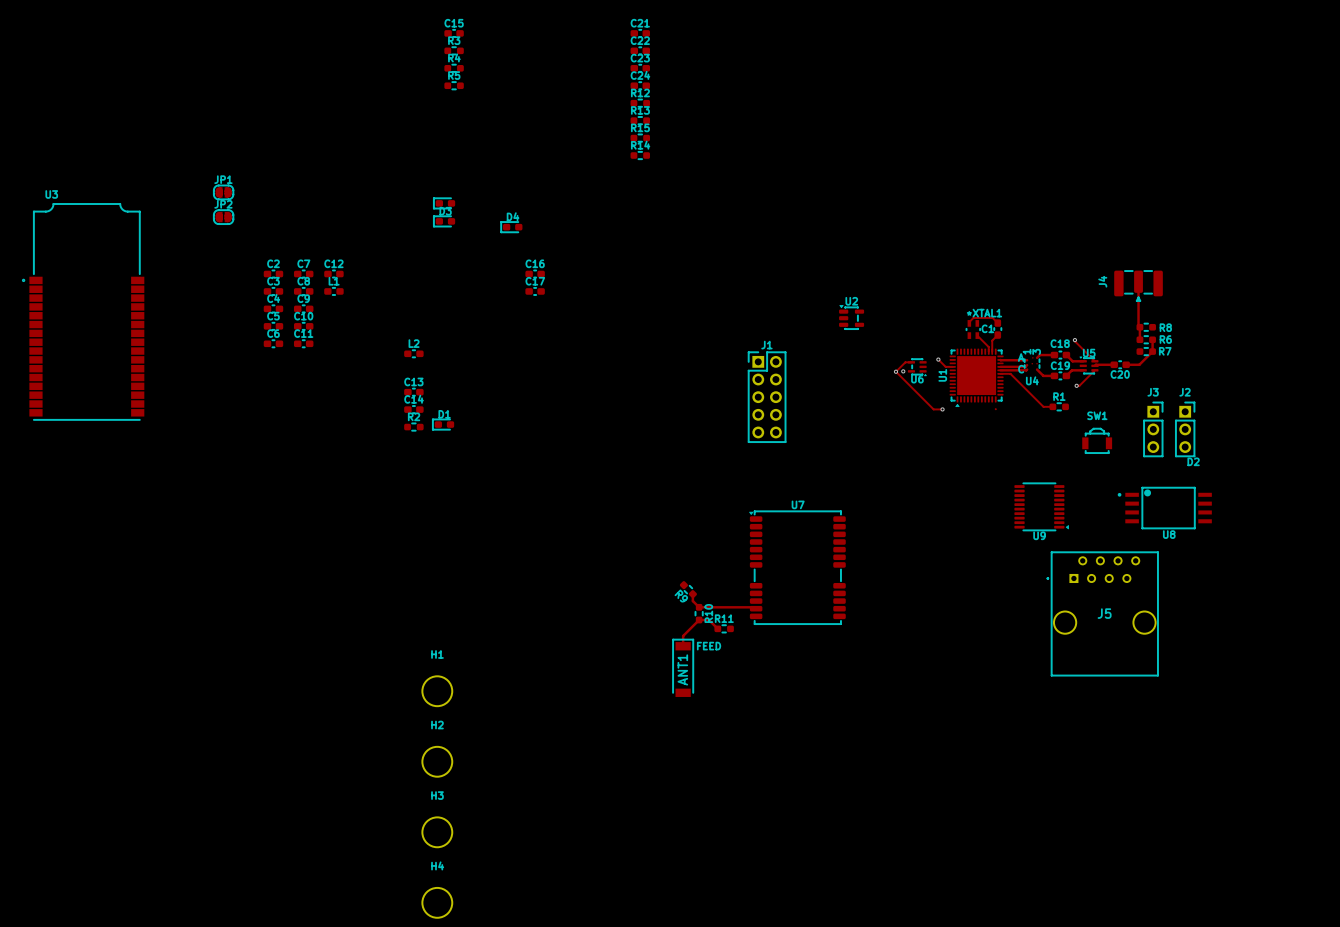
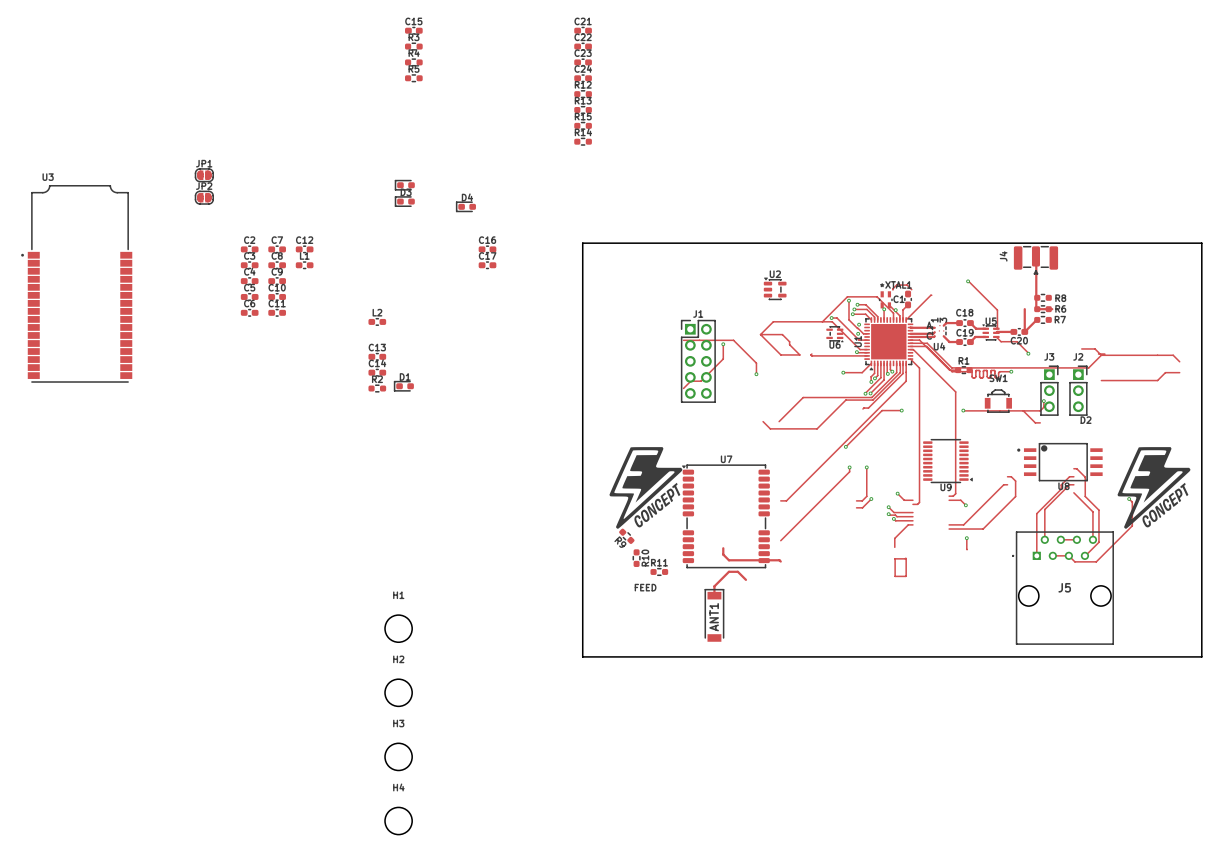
board edge: none -> (582, 243) (1201, 243) (1201, 656) (582, 656) (582, 243)
track: (1138, 281) (1139, 339) -> (1035, 256) (1036, 309) (1052, 309)
track: none -> (911, 289) (907, 285) (896, 285) (892, 290)
track: (997, 323) (992, 317) (973, 317) (969, 323) -> none
track: none -> (931, 295) (906, 319)
via: none -> (848, 300)
track: none -> (857, 304) (865, 304) (877, 316) (877, 319)
via: none -> (857, 304)
track: none -> (884, 309) (884, 319)
via: none -> (884, 309)
track: none -> (1024, 309) (1024, 331) (1037, 319)
track: (1152, 339) (1152, 351) (1139, 364) (1126, 364) -> none
track: none -> (854, 309) (866, 309) (874, 317) (874, 319)
via: none -> (854, 309)
via: none -> (895, 310)
track: (1074, 340) (1094, 361) -> (968, 281) (997, 310) (996, 328)
via position: (1074, 340) -> (968, 281)
track: none -> (852, 314) (865, 314) (871, 319)
via: none -> (852, 314)
track: none -> (831, 318) (836, 318) (859, 340) (867, 340)
via: none -> (831, 318)
track: none -> (893, 319) (893, 313) (877, 296) (847, 296) (822, 321)
via: none -> (859, 324)
track: (938, 359) (945, 366) (948, 366) -> (848, 300) (848, 319) (863, 333)
via: (938, 359) -> none
track: (911, 362) (905, 362) (895, 371) (933, 409) (942, 409) -> none
via: none -> (858, 333)
track: none -> (760, 334) (773, 321) (832, 321) (860, 349) (867, 349)
track: none -> (760, 334) (780, 354) (799, 354) (782, 334) (760, 334)
track: (1094, 370) (1079, 385) (1076, 385) -> (996, 336) (1001, 341) (1017, 341) (1028, 353)
via: (895, 371) -> none
via: (903, 371) -> none
track: none -> (683, 340) (733, 340) (756, 363) (756, 374)
track: none -> (910, 343) (927, 343) (951, 367) (1088, 367) (1101, 355)
track: none -> (723, 344) (723, 358) (701, 381) (690, 381) (683, 388)
via: none -> (723, 344)
track: none -> (910, 346) (926, 346) (952, 371) (971, 370) (973, 377) (975, 377) (976, 370) (979, 370) (981, 378) (983, 377) (983, 370) (987, 370) (988, 378) (990, 377) (991, 370) (994, 370) (996, 378) (998, 377) (999, 371) (1011, 371)
track: none -> (1081, 348) (1095, 348) (1101, 355)
track: none -> (910, 349) (913, 349) (955, 391) (955, 493) (949, 496)
via: (1076, 385) -> none
track: none -> (856, 352) (867, 352)
via: none -> (856, 352)
via: none -> (1028, 353)
track: none -> (811, 354) (811, 355) (867, 355)
track: none -> (1098, 354) (1104, 354)
track: none -> (1101, 355) (1173, 355) (1179, 361)
track: none -> (910, 359) (919, 368) (919, 502) (912, 504)
track: none -> (871, 363) (862, 372) (843, 372)
track: none -> (874, 363) (874, 373) (871, 376) (871, 381)
track: none -> (877, 363) (877, 375) (874, 378)
track: none -> (880, 363) (880, 377) (865, 393)
track: none -> (884, 363) (884, 379) (870, 393)
track: none -> (887, 363) (887, 373)
track: none -> (890, 363) (892, 371)
track: none -> (896, 363) (896, 372) (871, 397) (803, 397) (779, 421)
track: none -> (899, 363) (900, 372) (872, 400) (845, 400) (817, 428) (770, 428) (763, 421)
track: none -> (903, 363) (903, 373) (868, 408) (862, 408)
track: none -> (906, 363) (906, 381) (786, 500) (780, 500)
via: none -> (892, 371)
via: none -> (1011, 371)
via: none -> (843, 372)
via: (942, 409) -> none
track: none -> (1179, 372) (1165, 372) (1157, 380) (1101, 380)
via: none -> (887, 373)
via: none -> (756, 374)
via: none -> (874, 378)
via: none -> (871, 381)
via: none -> (865, 393)
via: none -> (870, 393)
track: none -> (1043, 401) (1043, 407) (1040, 410) (963, 410)
via: none -> (1043, 401)
track: none -> (901, 410) (882, 410) (845, 446)
via: none -> (901, 410)
via: none -> (963, 410)
track: none -> (1023, 410) (1035, 422) (1040, 422)
drawing: none -> [609, 447, 683, 529]
via: none -> (845, 446)
drawing: none -> [1117, 447, 1191, 529]
track: none -> (849, 467) (849, 471) (780, 540)
via: none -> (849, 467)
track: none -> (866, 467) (866, 496) (862, 500) (856, 500)
via: none -> (866, 467)
track: none -> (1073, 468) (1076, 468) (1085, 477) (1085, 496) (1098, 510) (1098, 542) (1084, 555)
track: none -> (1007, 476) (1011, 476) (1015, 481) (1015, 496) (983, 529) (949, 529)
track: none -> (1073, 476) (1069, 476) (1061, 485) (1061, 489) (1036, 513) (1036, 555)
track: none -> (1007, 484) (1003, 484) (963, 524) (949, 524)
track: none -> (1073, 484) (1069, 484) (1044, 509) (1044, 539)
track: none -> (1073, 492) (1092, 511) (1092, 539)
track: none -> (897, 493) (904, 500) (912, 500)
via: none -> (897, 493)
track: none -> (871, 499) (862, 507) (856, 507)
via: none -> (871, 499)
track: none -> (1129, 499) (1132, 502) (1132, 525) (1096, 561) (1074, 561) (1068, 555) (1052, 555)
via: none -> (1129, 499)
track: none -> (949, 500) (960, 500) (965, 505)
via: none -> (965, 505)
track: none -> (888, 507) (894, 512) (912, 512)
via: none -> (888, 507)
track: none -> (888, 514) (896, 516) (912, 516)
via: none -> (888, 514)
track: none -> (893, 518) (895, 520) (912, 520)
via: none -> (893, 518)
track: none -> (912, 524) (908, 524) (894, 538) (894, 547)
track: none -> (966, 538) (967, 549)
via: none -> (966, 538)
track: none -> (1060, 539) (1076, 539)
track: (692, 594) (692, 601) (699, 607) (756, 608) -> (723, 548) (723, 554) (728, 560) (780, 561)
track: none -> (905, 558) (906, 576) (895, 576) (894, 558) (905, 558)
J5 position: (1102, 613) -> (1063, 588)
track: (717, 628) (708, 620) (699, 620) (683, 635) (683, 646) -> (745, 579) (737, 571) (728, 571) (714, 586) (714, 595)
ANT1 position: (683, 667) -> (714, 615)

